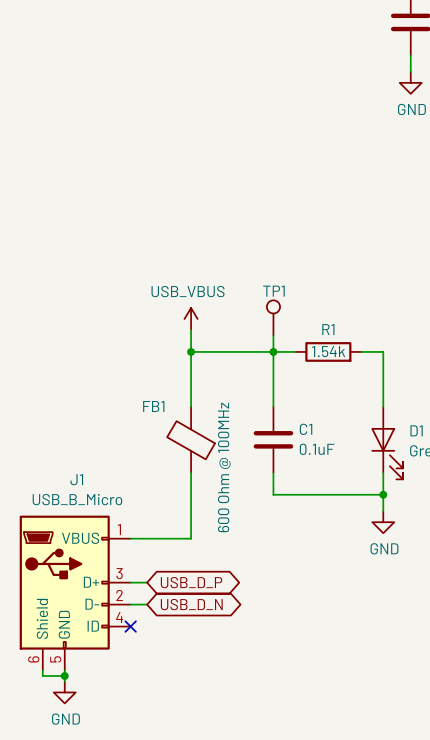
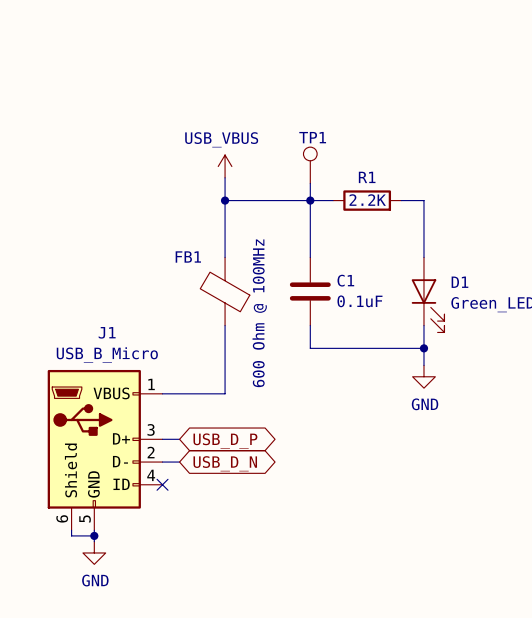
R1 text: 1.54k (328, 351) -> 2.2K (367, 200)

